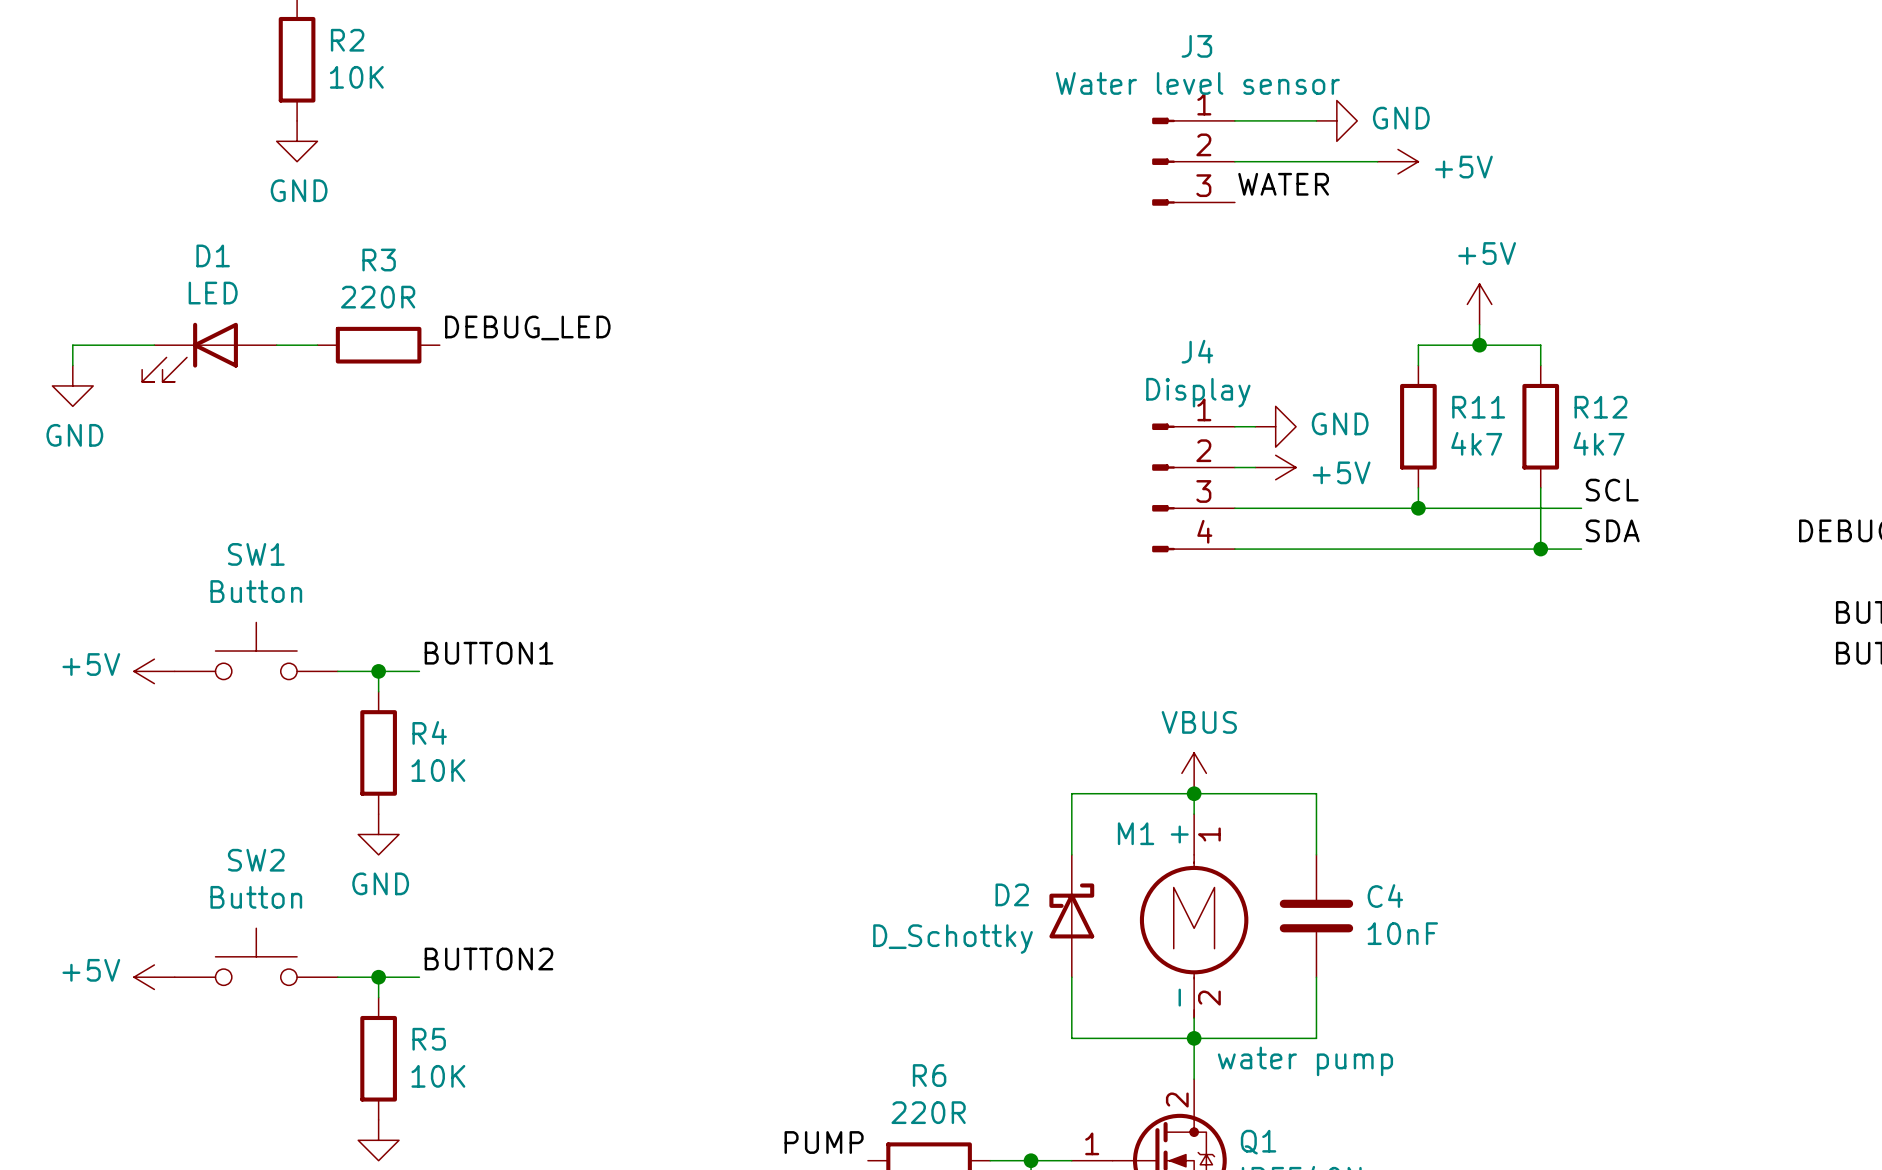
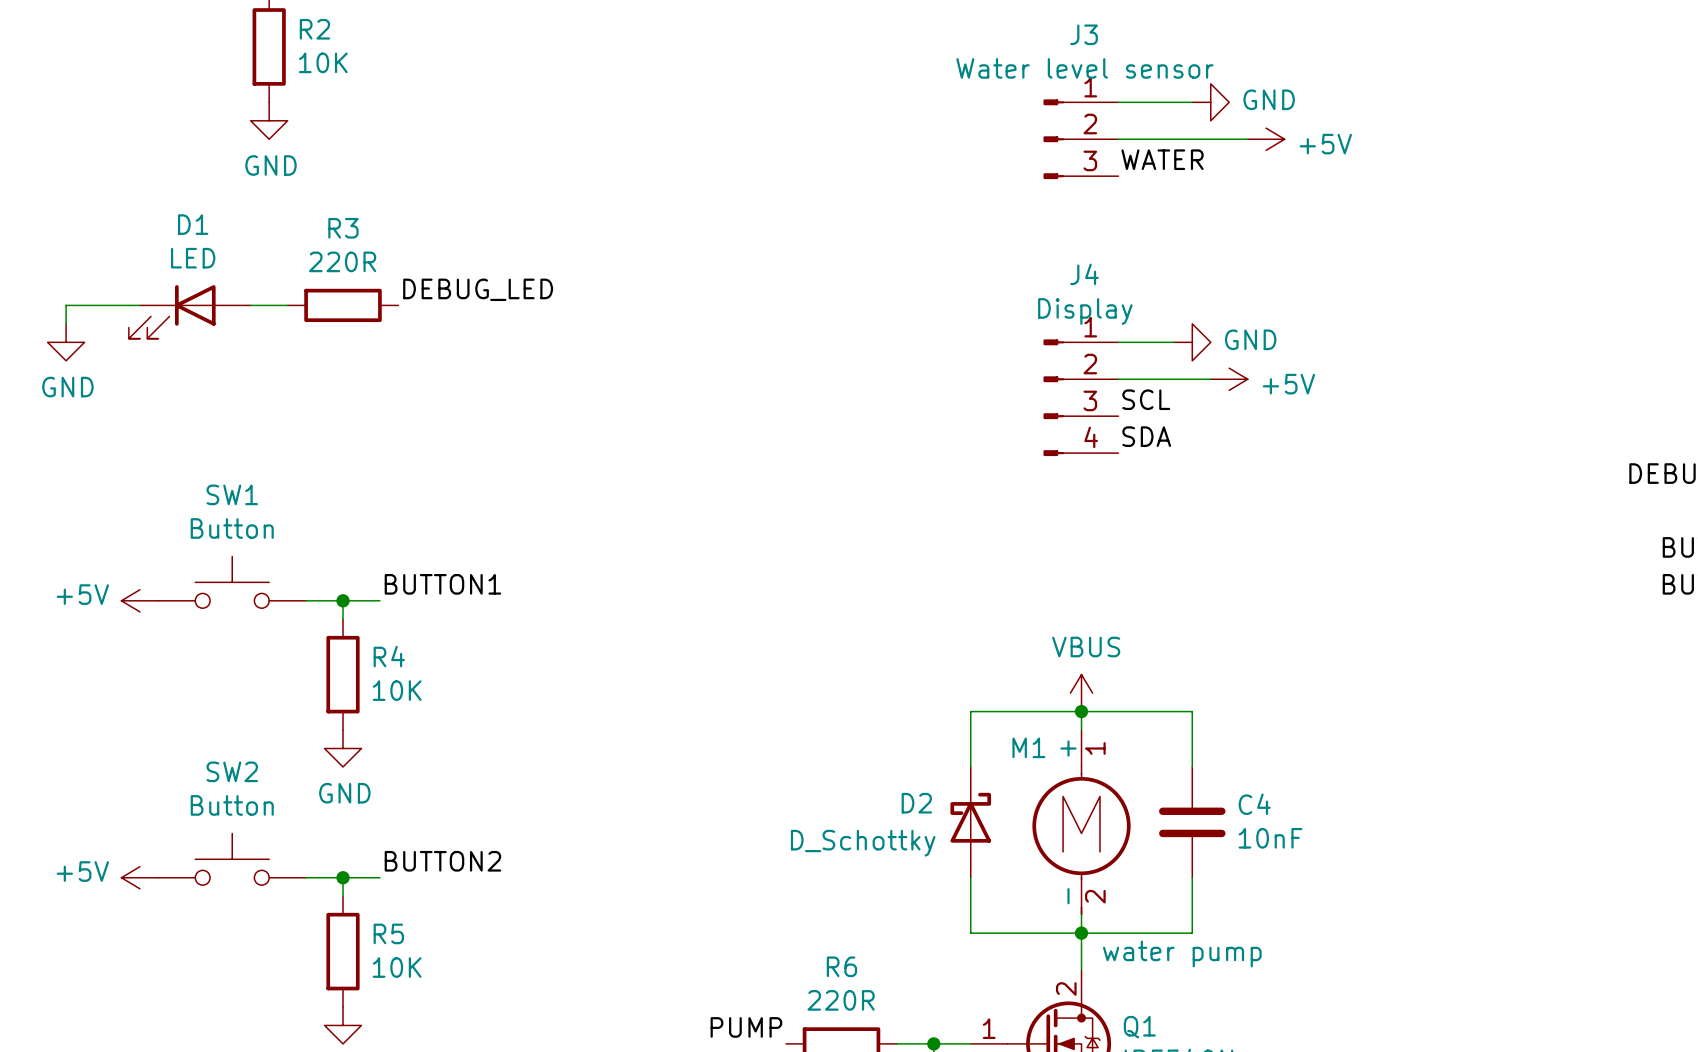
power symbol: +5V (1479, 304) -> none
wire: (1479, 324) (1479, 345) -> none
junction: (1479, 345) -> none
wire: (1418, 365) (1418, 345) (1540, 345) (1540, 365) -> none
wire: none -> (1118, 342) (1173, 342)
wire: none -> (1136, 379) (1210, 379)
power symbol position: GND (1275, 426) -> GND (1192, 342)
power symbol: none -> +5V (1229, 379)
R11: 4k7 (1418, 426) -> none
R12: 4k7 (1540, 426) -> none
wire: (1234, 467) (1255, 467) -> none
power symbol: +5V (1275, 467) -> none
J4 position: (1193, 487) -> (1080, 397)
wire: (1418, 487) (1418, 508) -> none
wire: (1540, 487) (1540, 549) -> none
label position: SCL (1612, 490) -> SCL (1146, 399)
wire: (1234, 508) (1581, 508) -> none
junction: (1418, 508) -> none
label position: SDA (1612, 530) -> SDA (1146, 436)
wire: (1234, 549) (1581, 549) -> none
junction: (1540, 549) -> none

